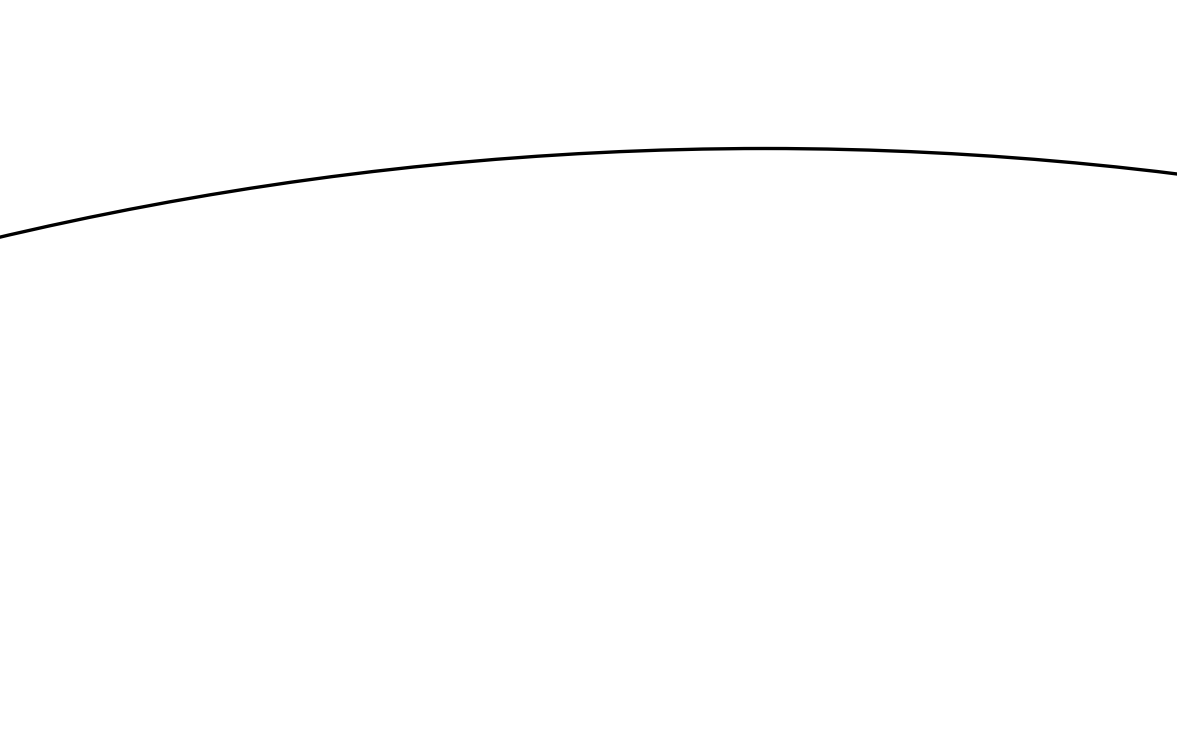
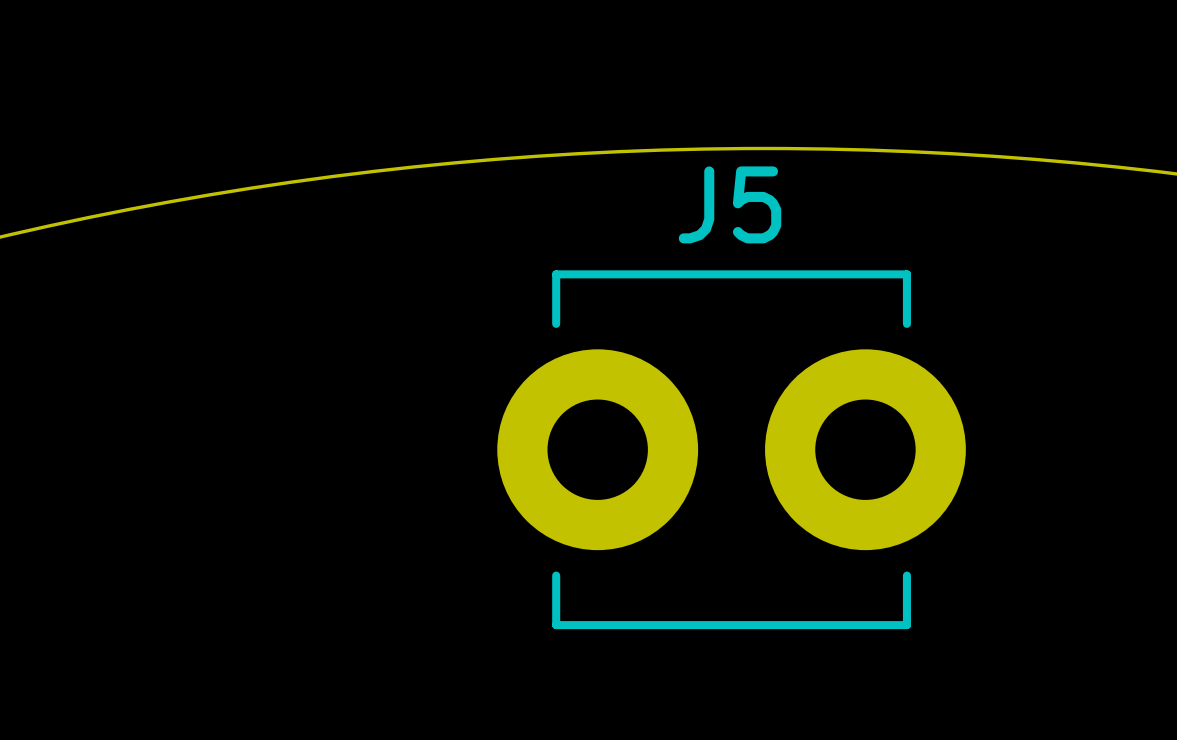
J5: none -> (731, 449)

